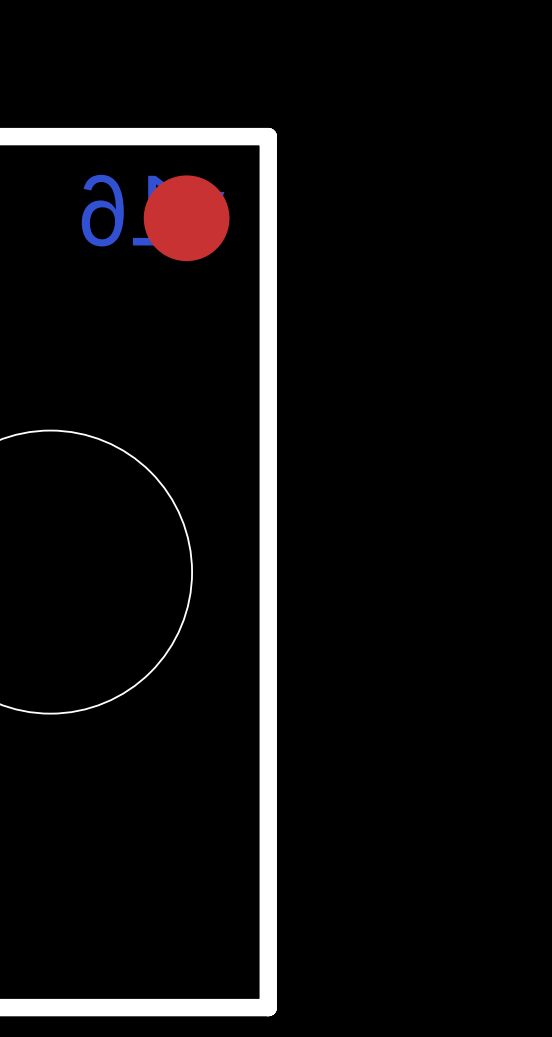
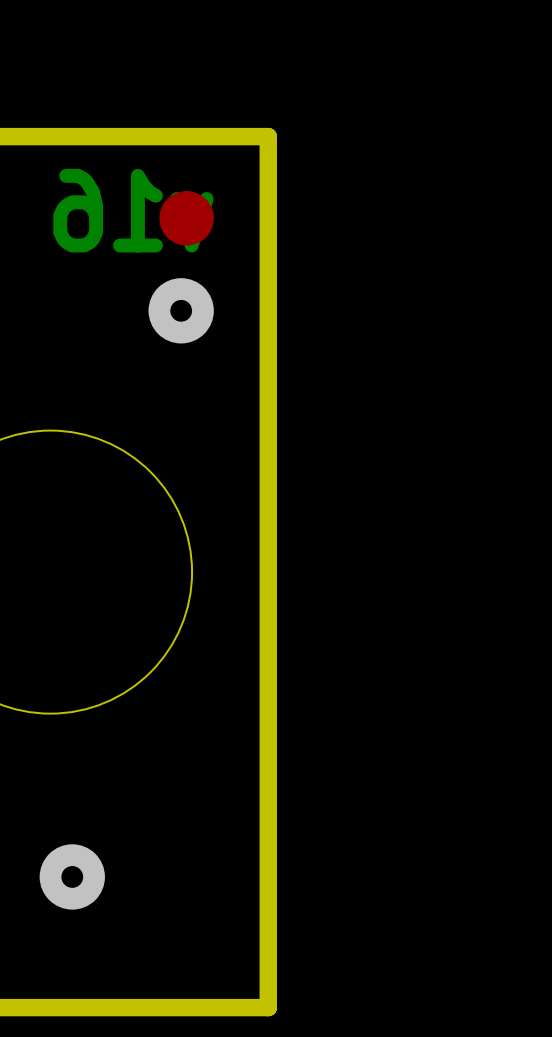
part footprint: [143, 175, 230, 262] -> [159, 191, 214, 246]
via: none -> (181, 310)
via: none -> (72, 876)

